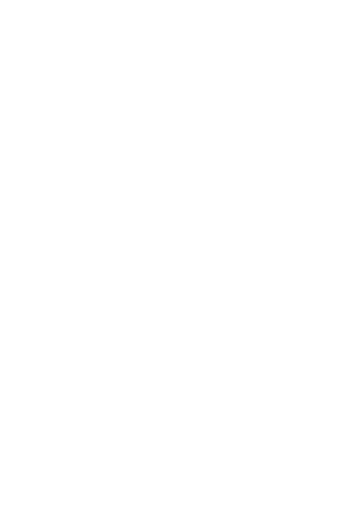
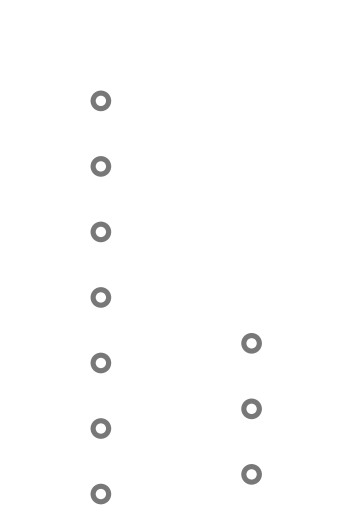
via: none -> (100, 100)
via: none -> (100, 166)
via: none -> (100, 231)
via: none -> (100, 297)
via: none -> (251, 343)
via: none -> (100, 362)
via: none -> (251, 408)
via: none -> (100, 428)
via: none -> (251, 474)
via: none -> (100, 494)

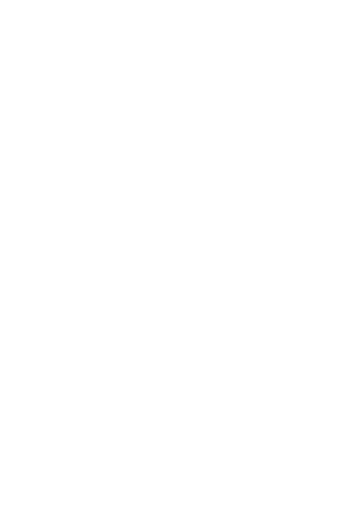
via: (100, 100) -> none
via: (100, 166) -> none
via: (100, 231) -> none
via: (100, 297) -> none
via: (251, 343) -> none
via: (100, 362) -> none
via: (251, 408) -> none
via: (100, 428) -> none
via: (251, 474) -> none
via: (100, 494) -> none

